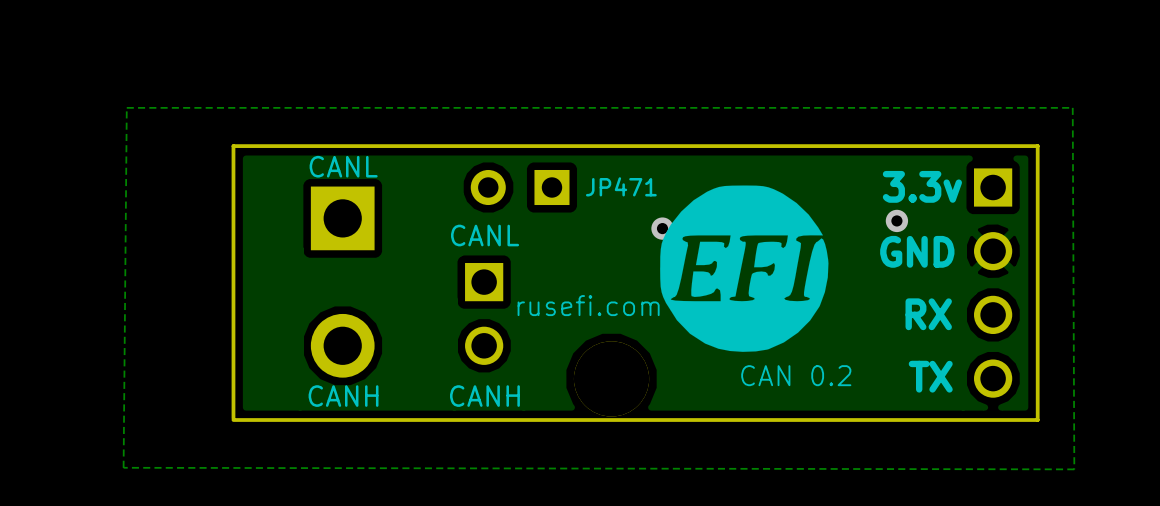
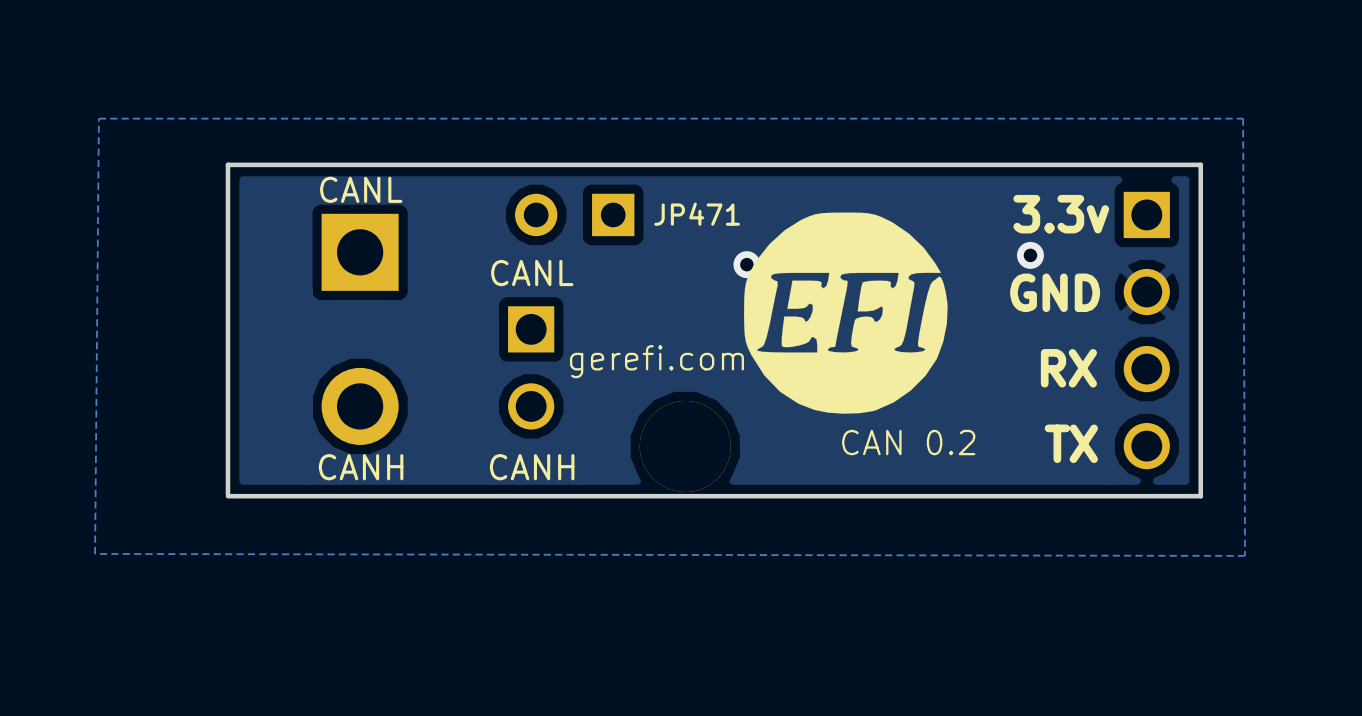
text: rusefi.com (588, 305) -> gerefi.com (656, 361)

